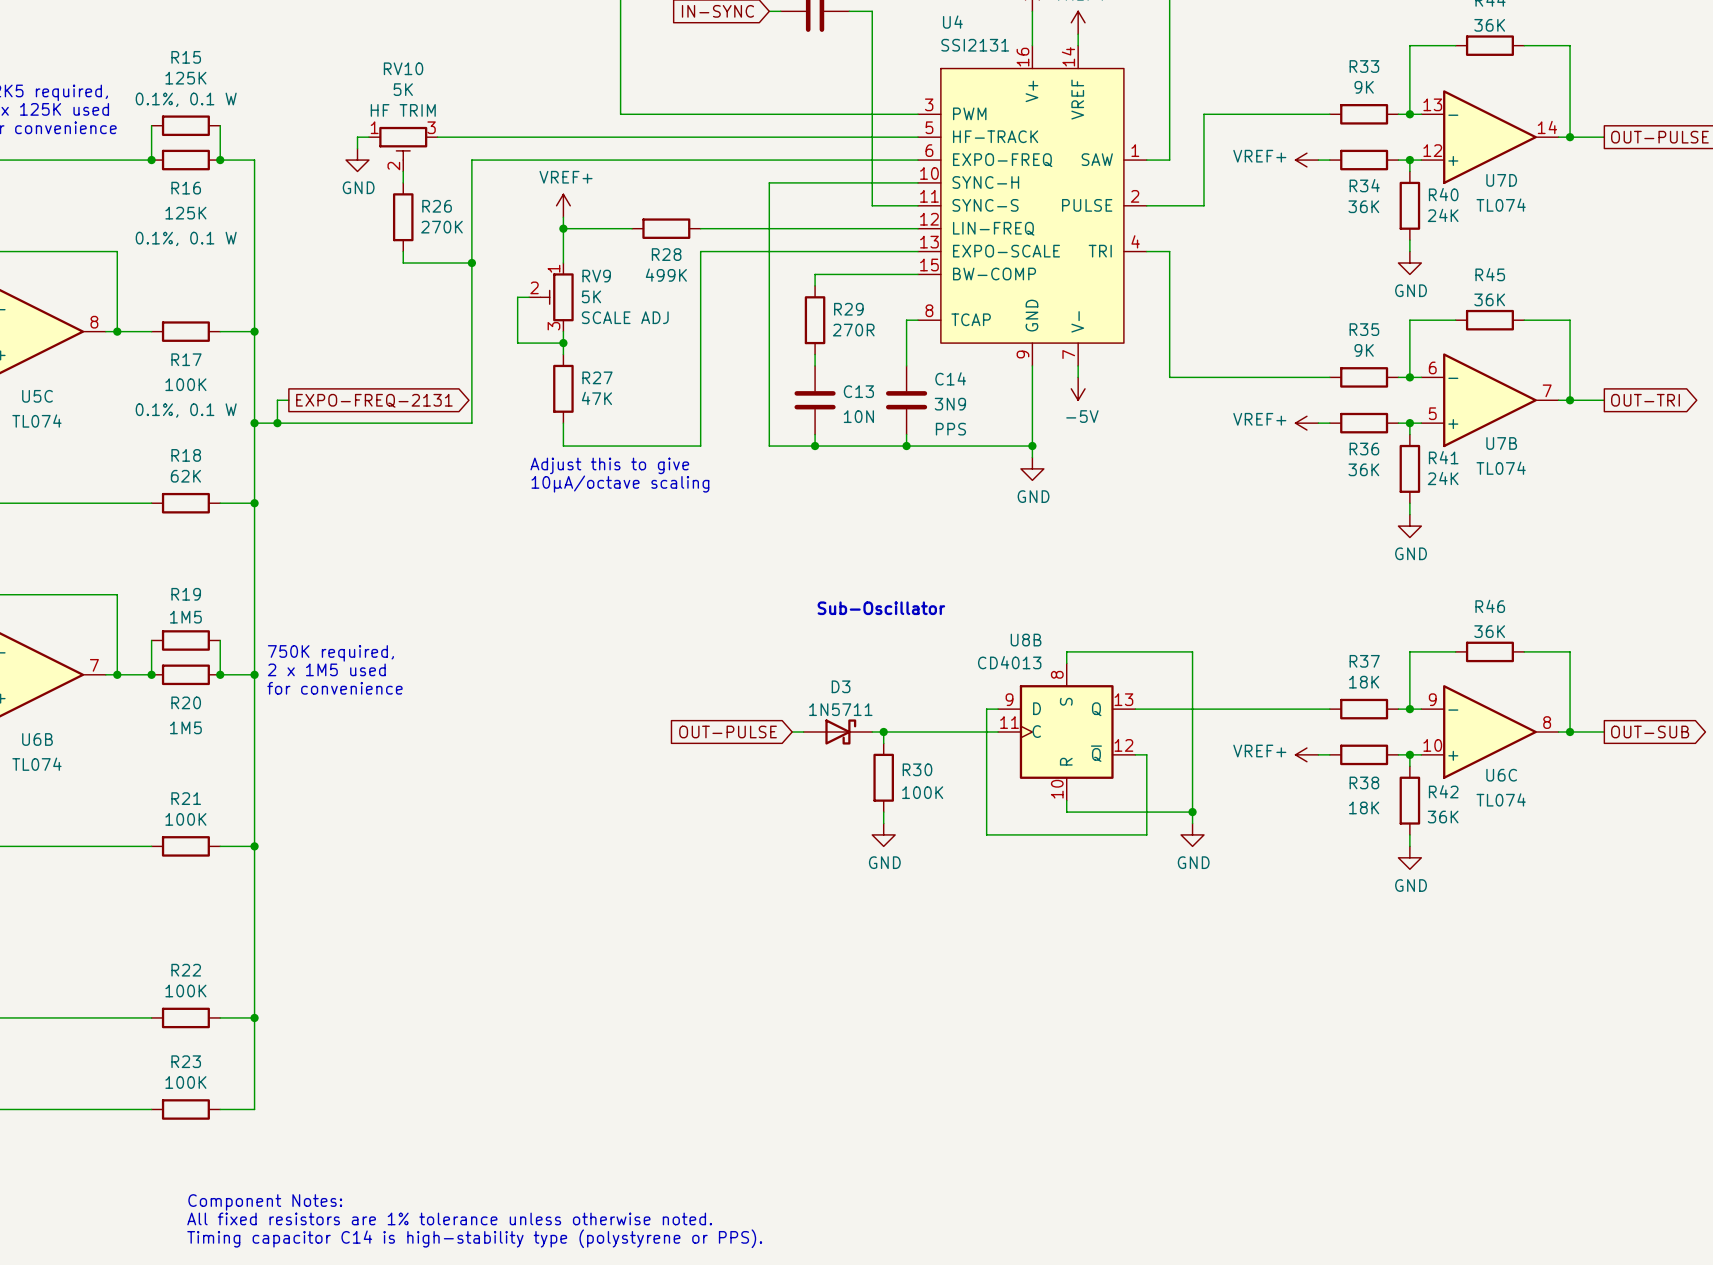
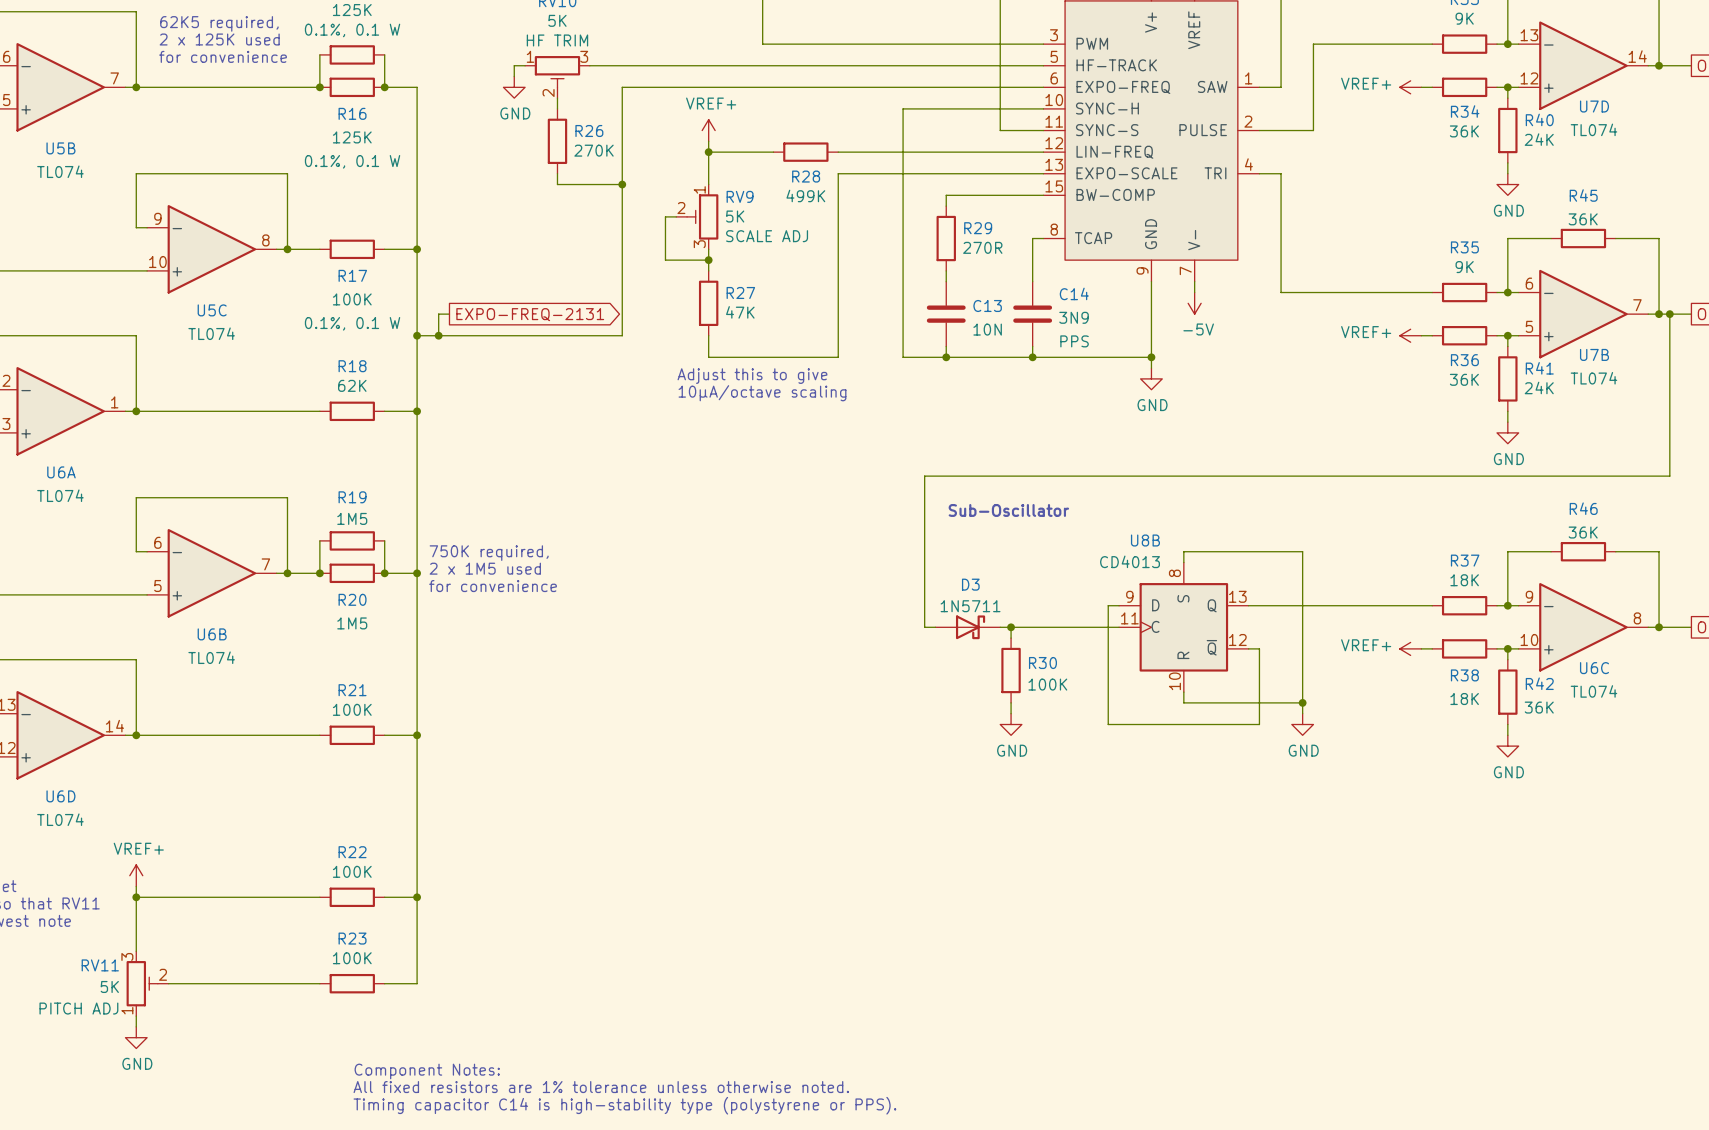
wire: none -> (1669, 314) (1669, 476) (924, 476) (924, 627)
junction: none -> (1669, 314)
global label: OUT-PULSE (728, 731) -> none

